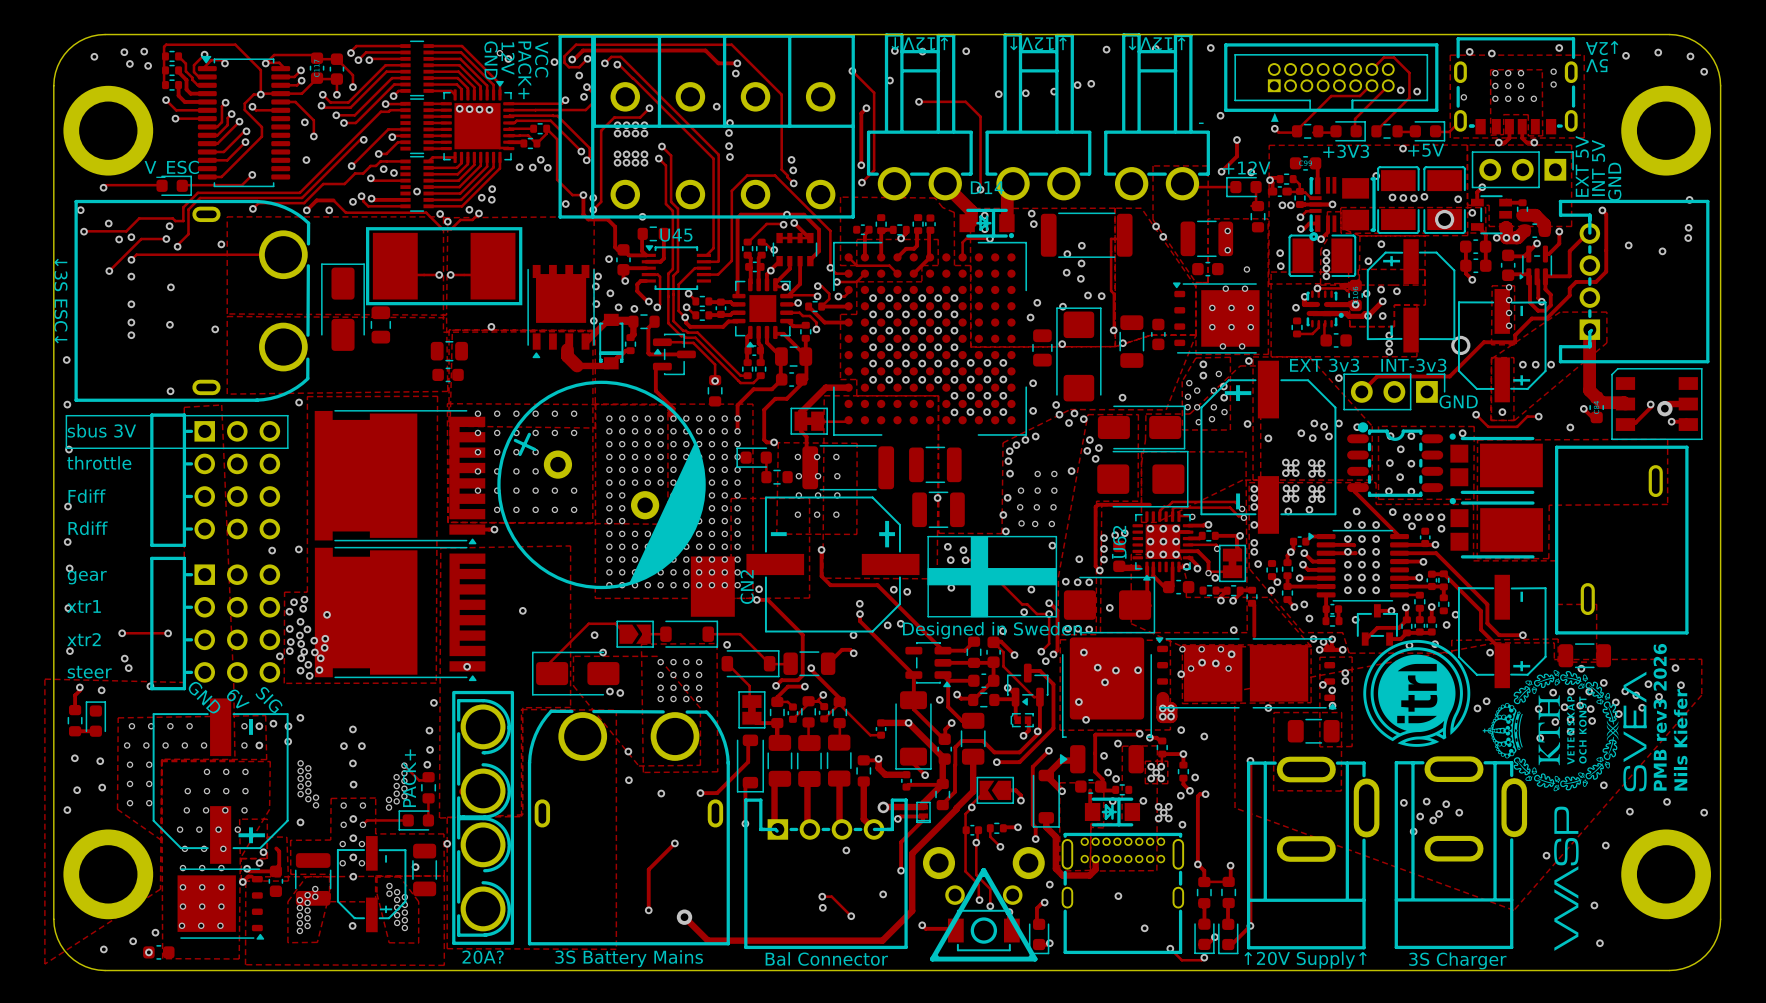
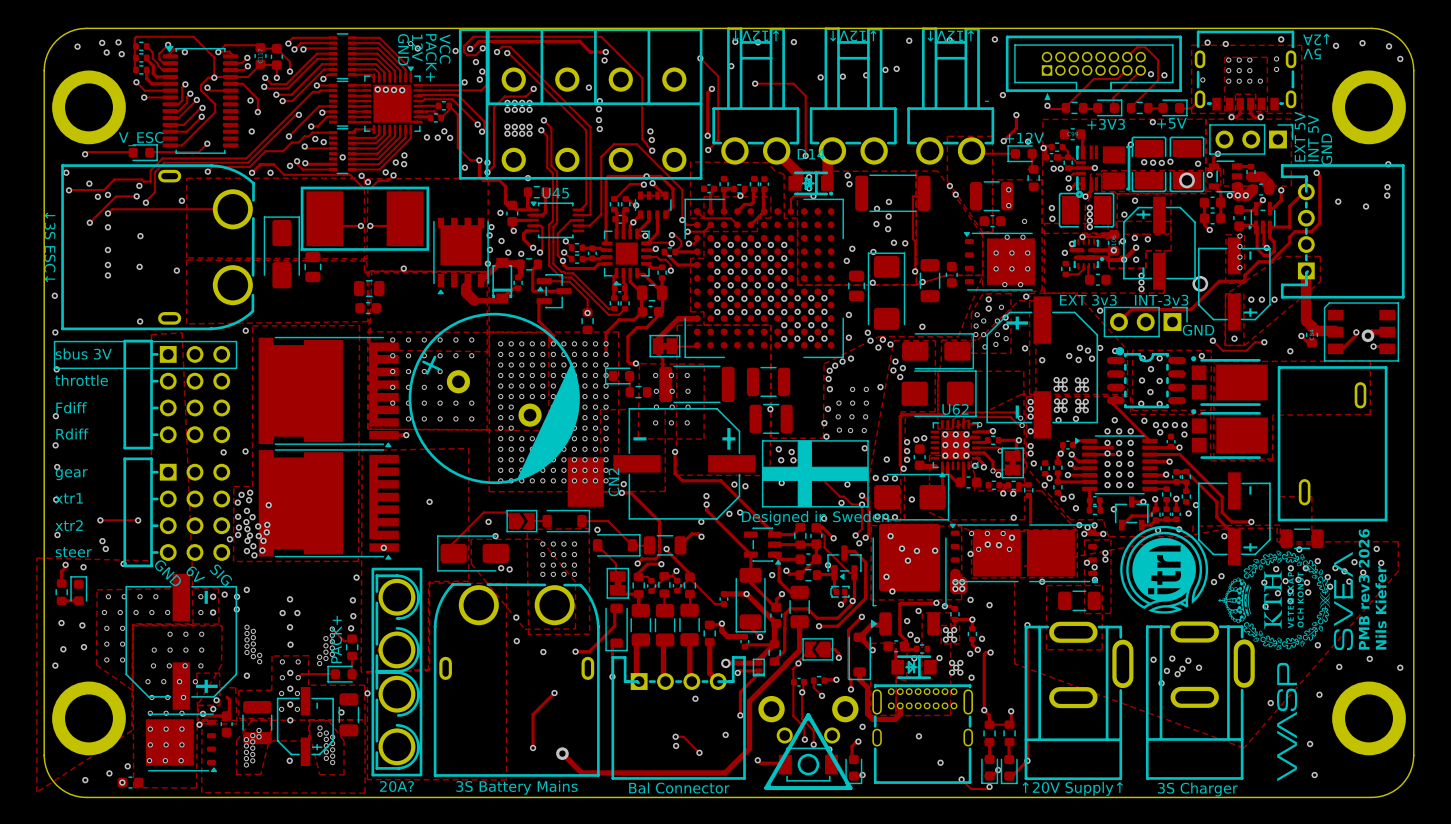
U62 name rotation: 0° (1119, 541) -> 90° clockwise (955, 409)
U62 name position: U62 (1119, 541) -> U62 (955, 409)

